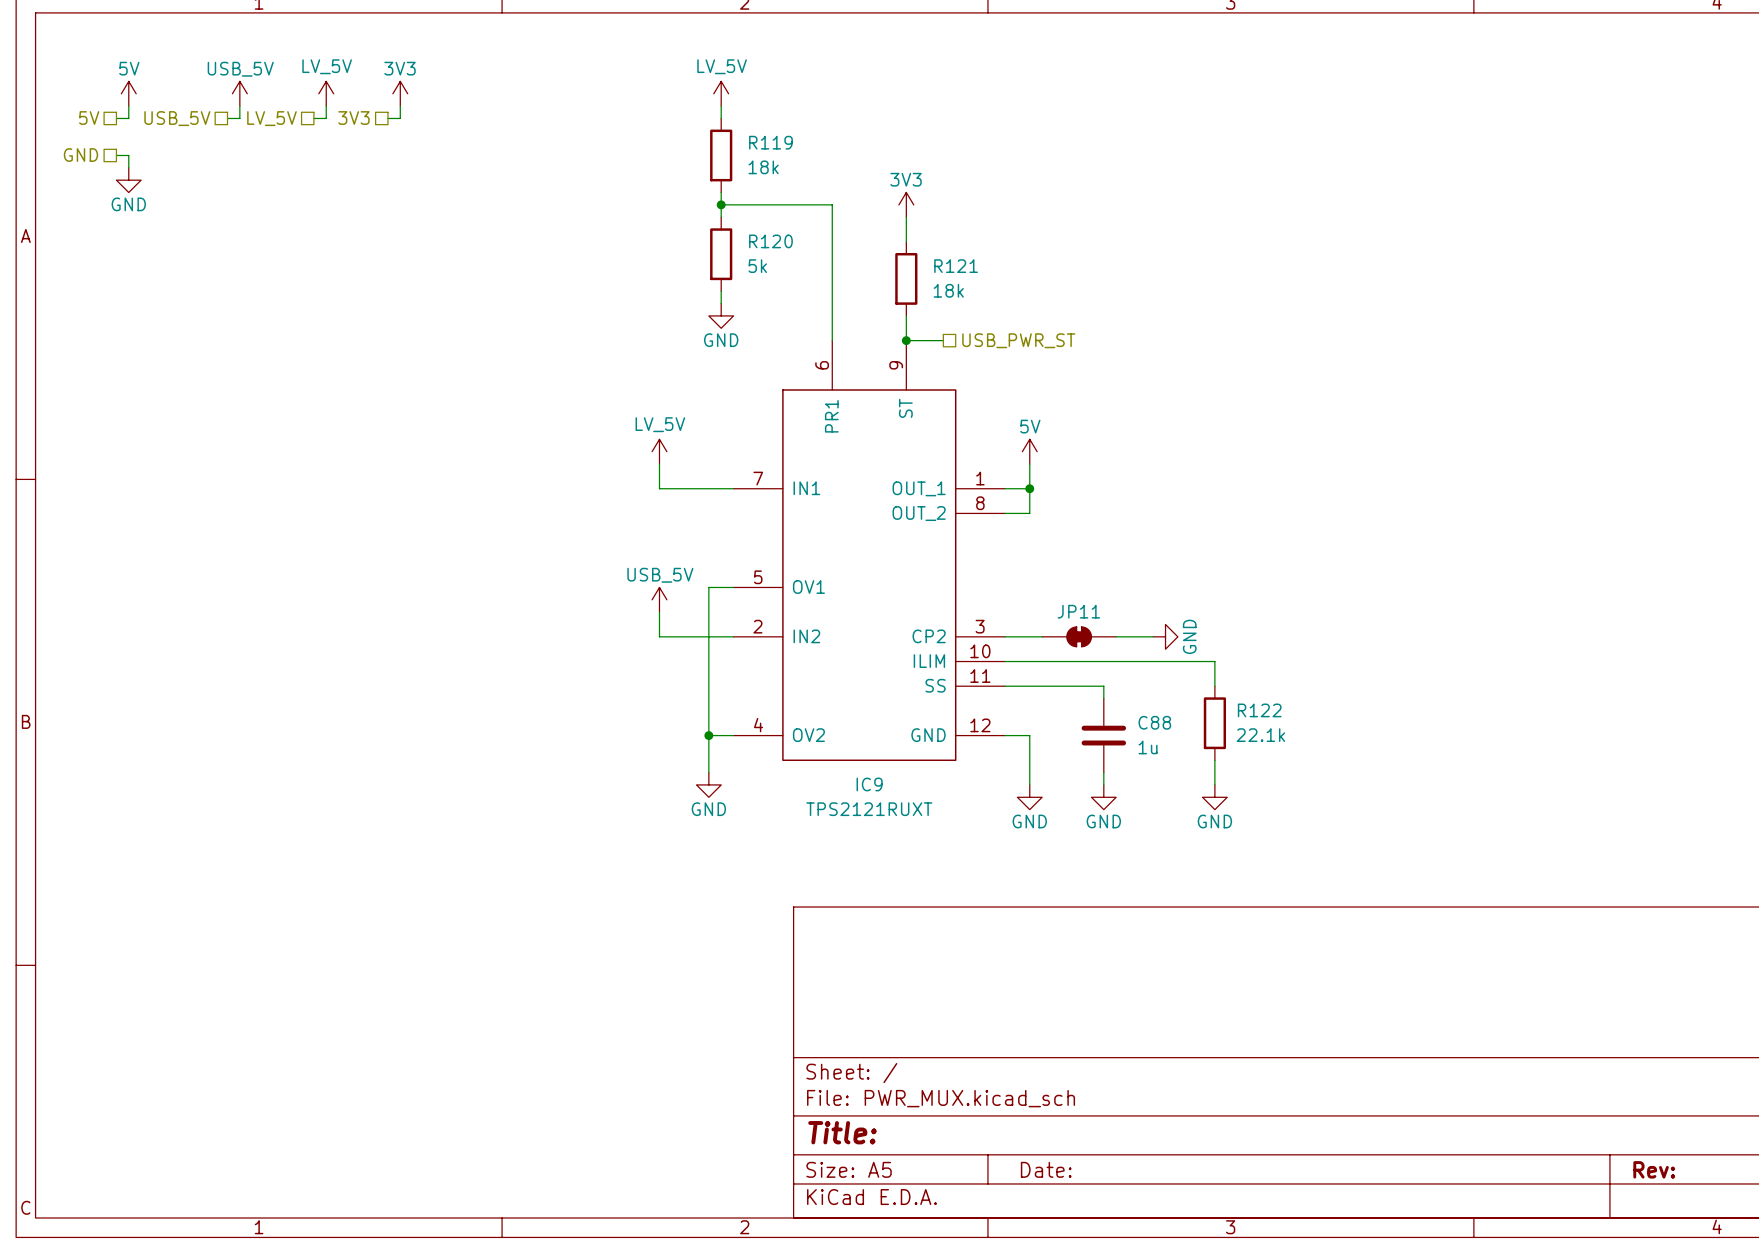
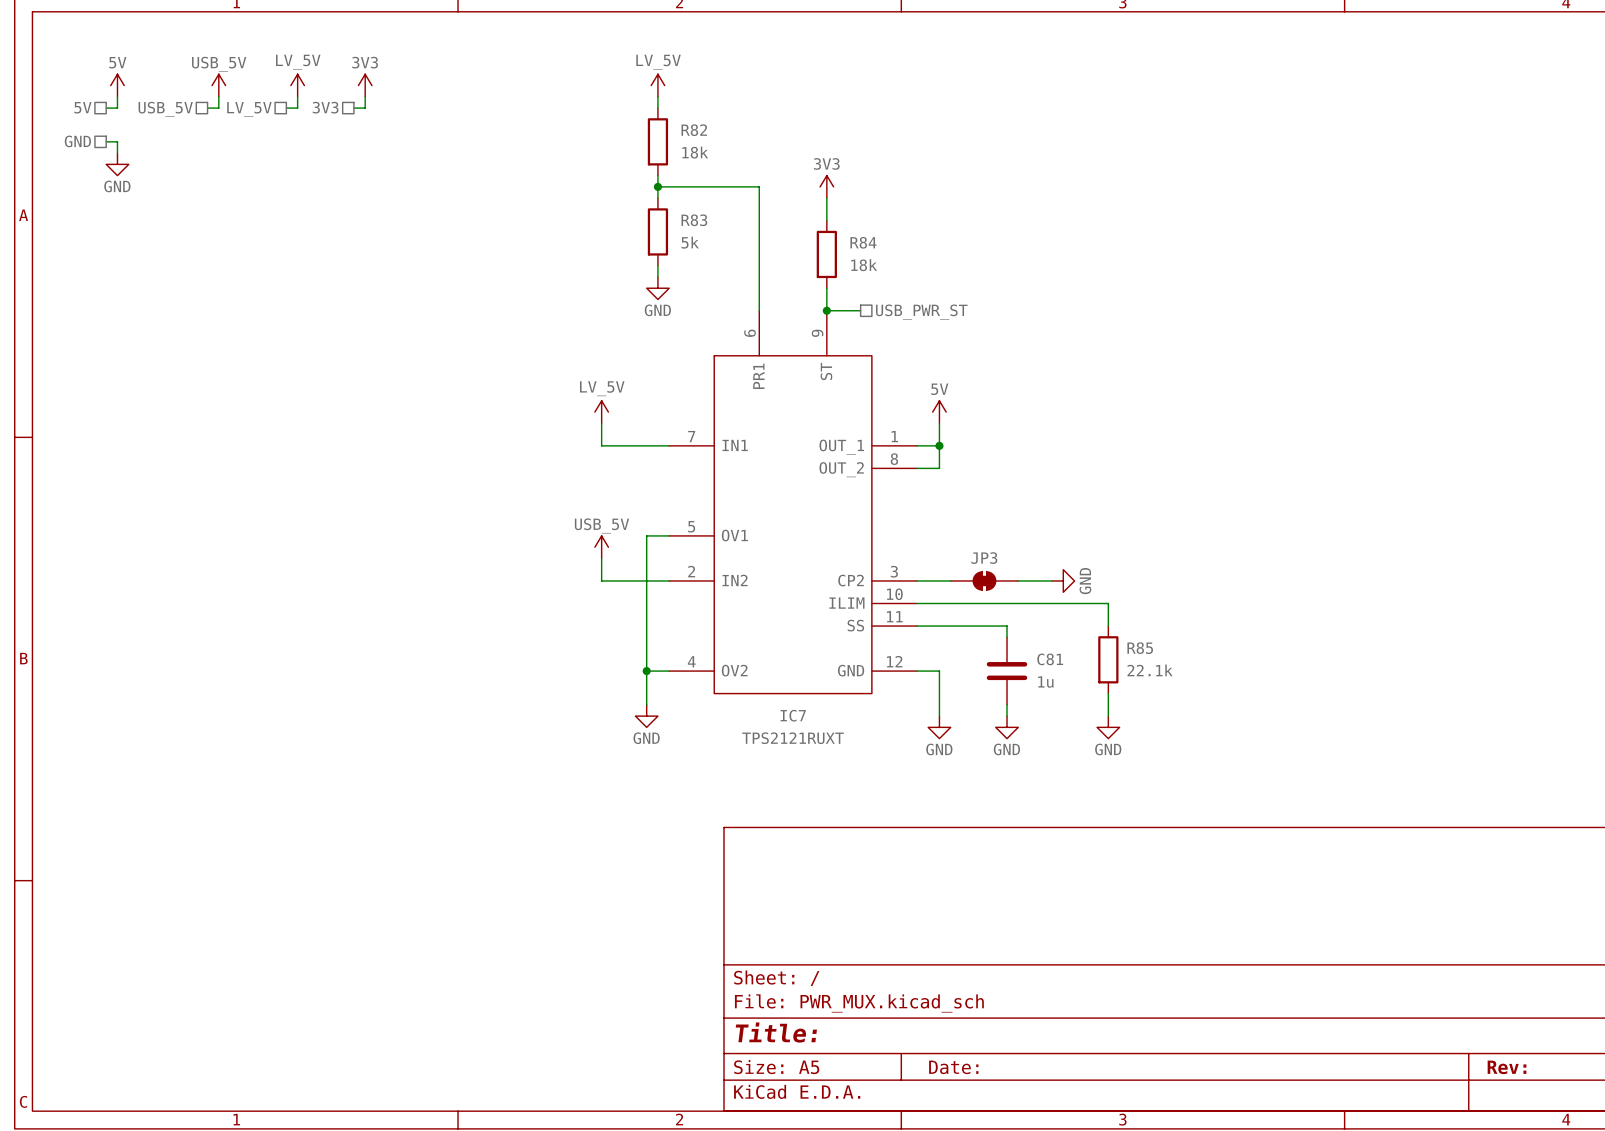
R119 name: R119 (770, 142) -> R82 (694, 130)
R120 name: R120 (770, 241) -> R83 (694, 220)
R121 name: R121 (956, 266) -> R84 (863, 242)
JP11 name: JP11 (1078, 611) -> JP3 (984, 558)
R122 name: R122 (1259, 710) -> R85 (1140, 648)
C88 name: C88 (1154, 722) -> C81 (1050, 659)
IC9 name: IC9 (869, 784) -> IC7 (793, 715)

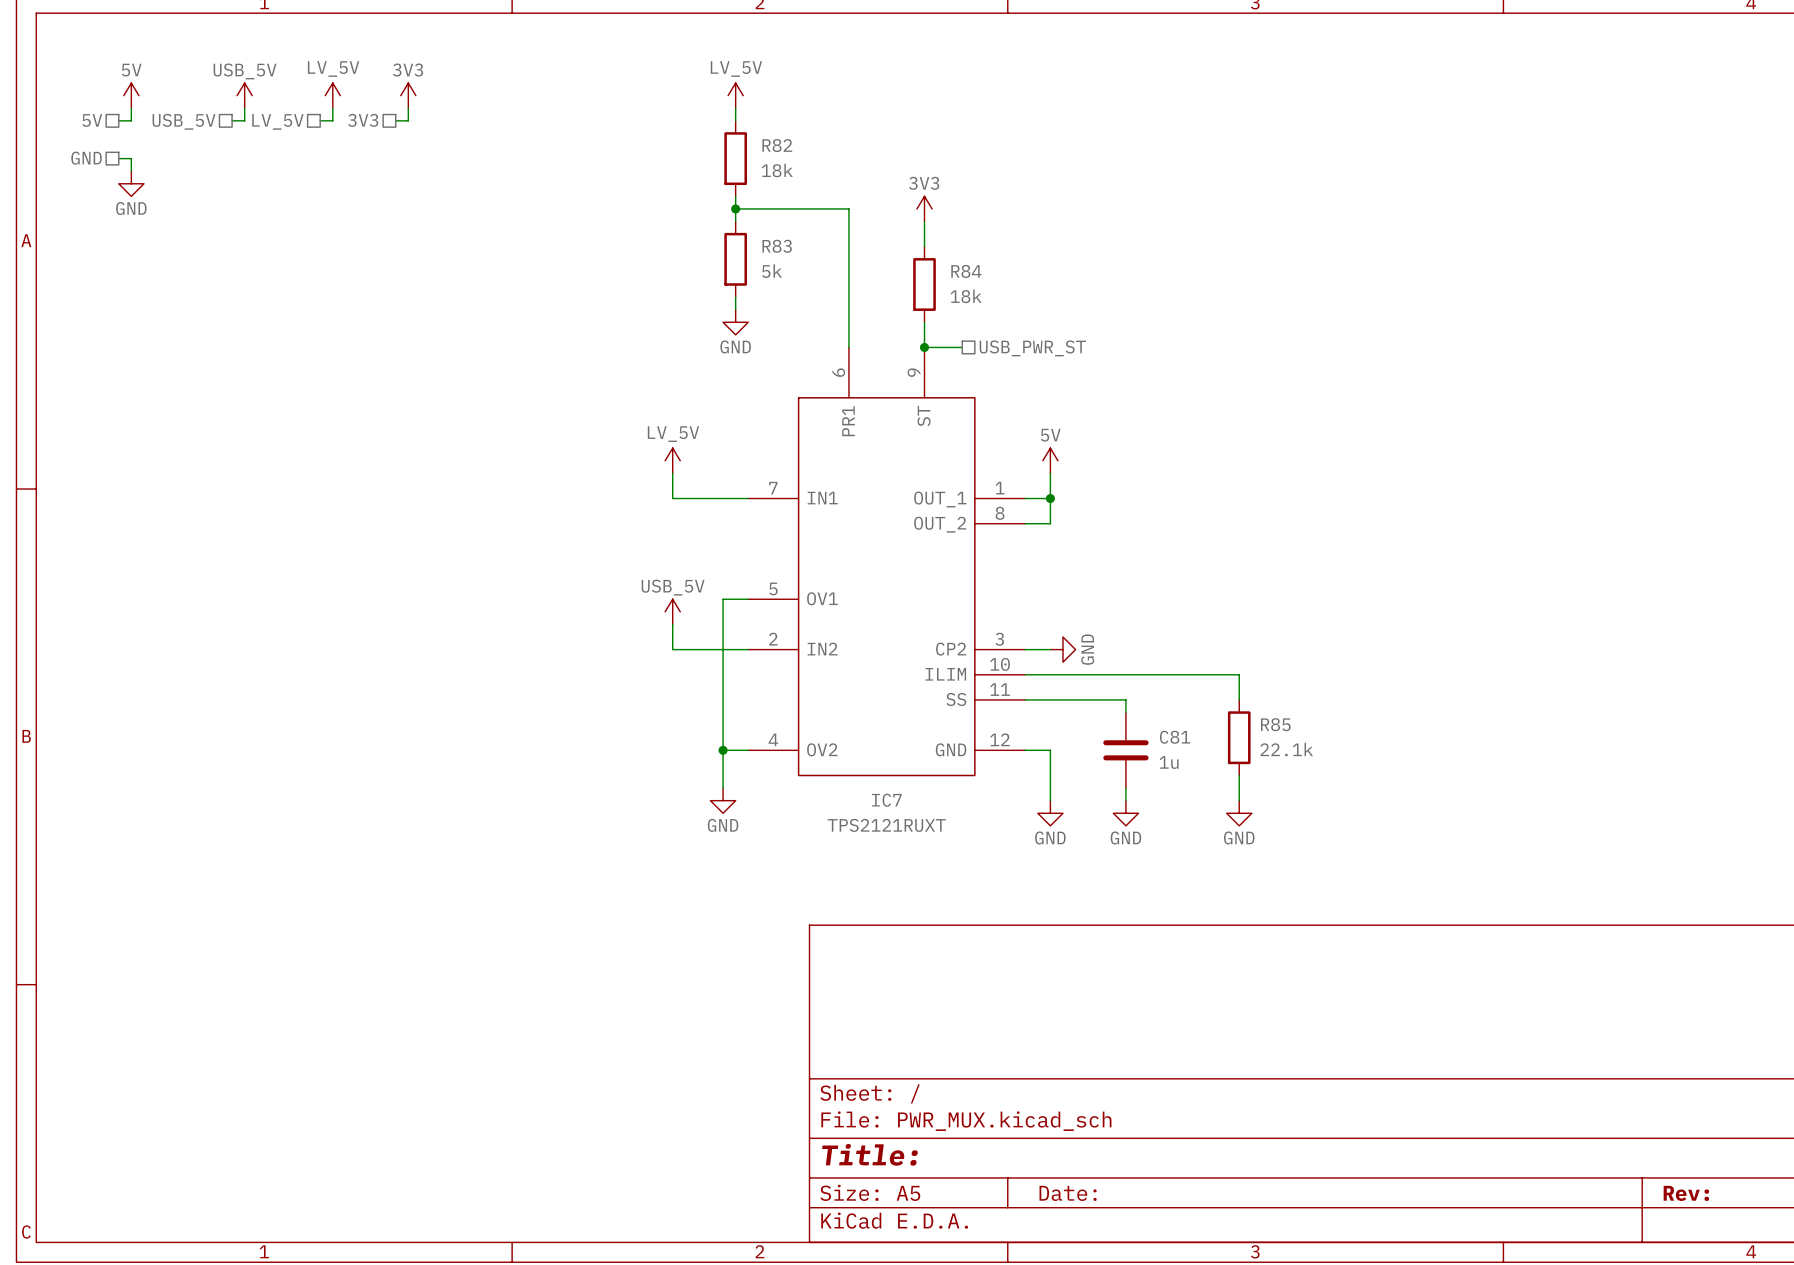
JP3: (984, 580) -> none
wire: (1018, 580) (1052, 580) -> none
power symbol position: GND (1063, 580) -> GND (1062, 649)

